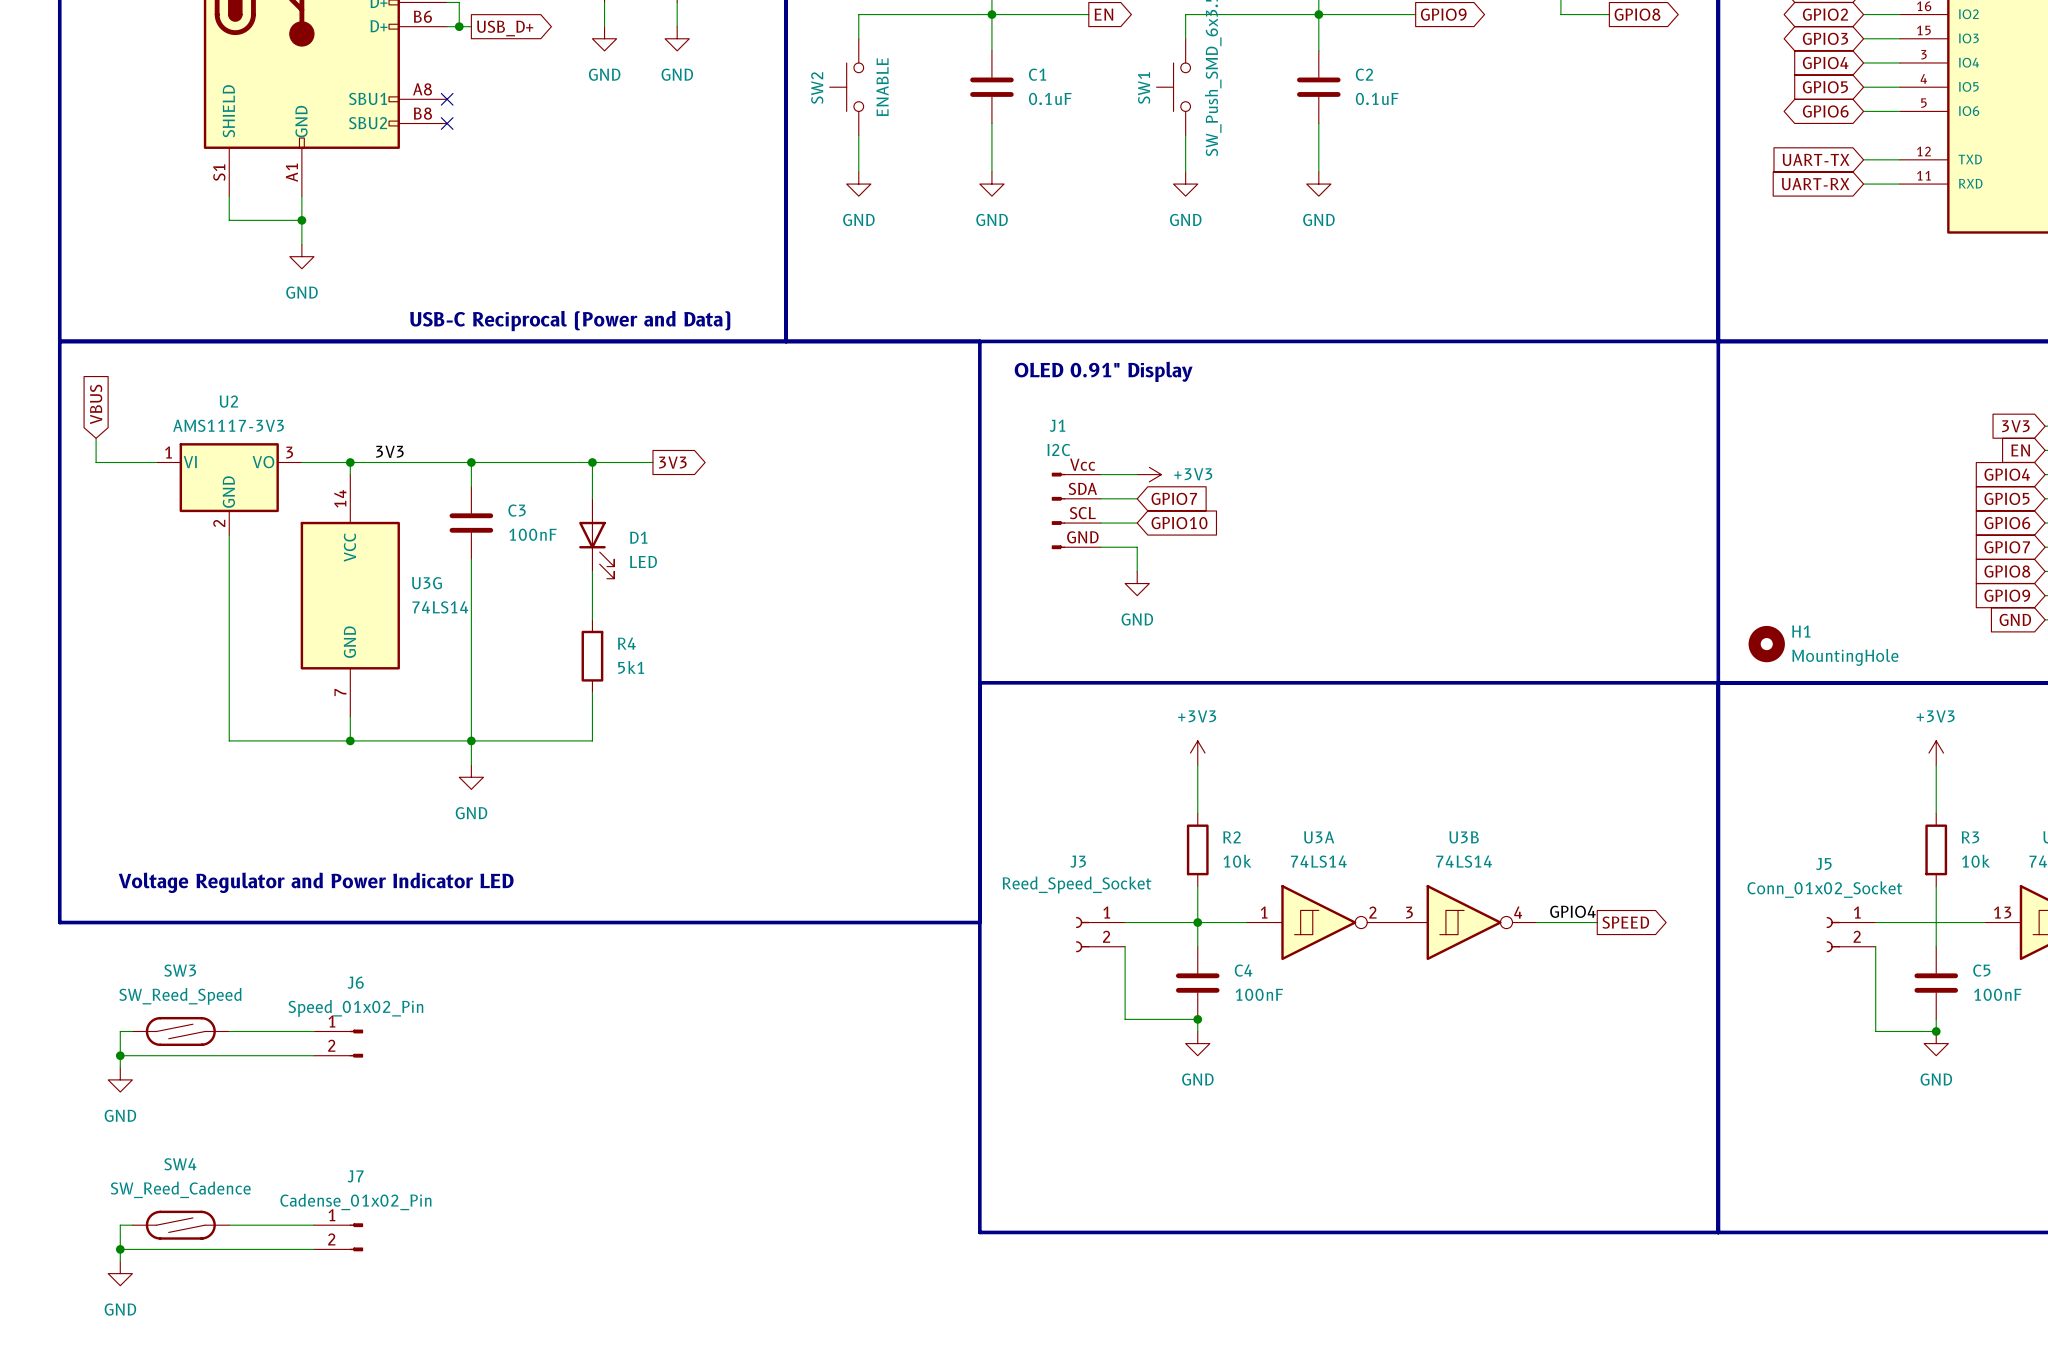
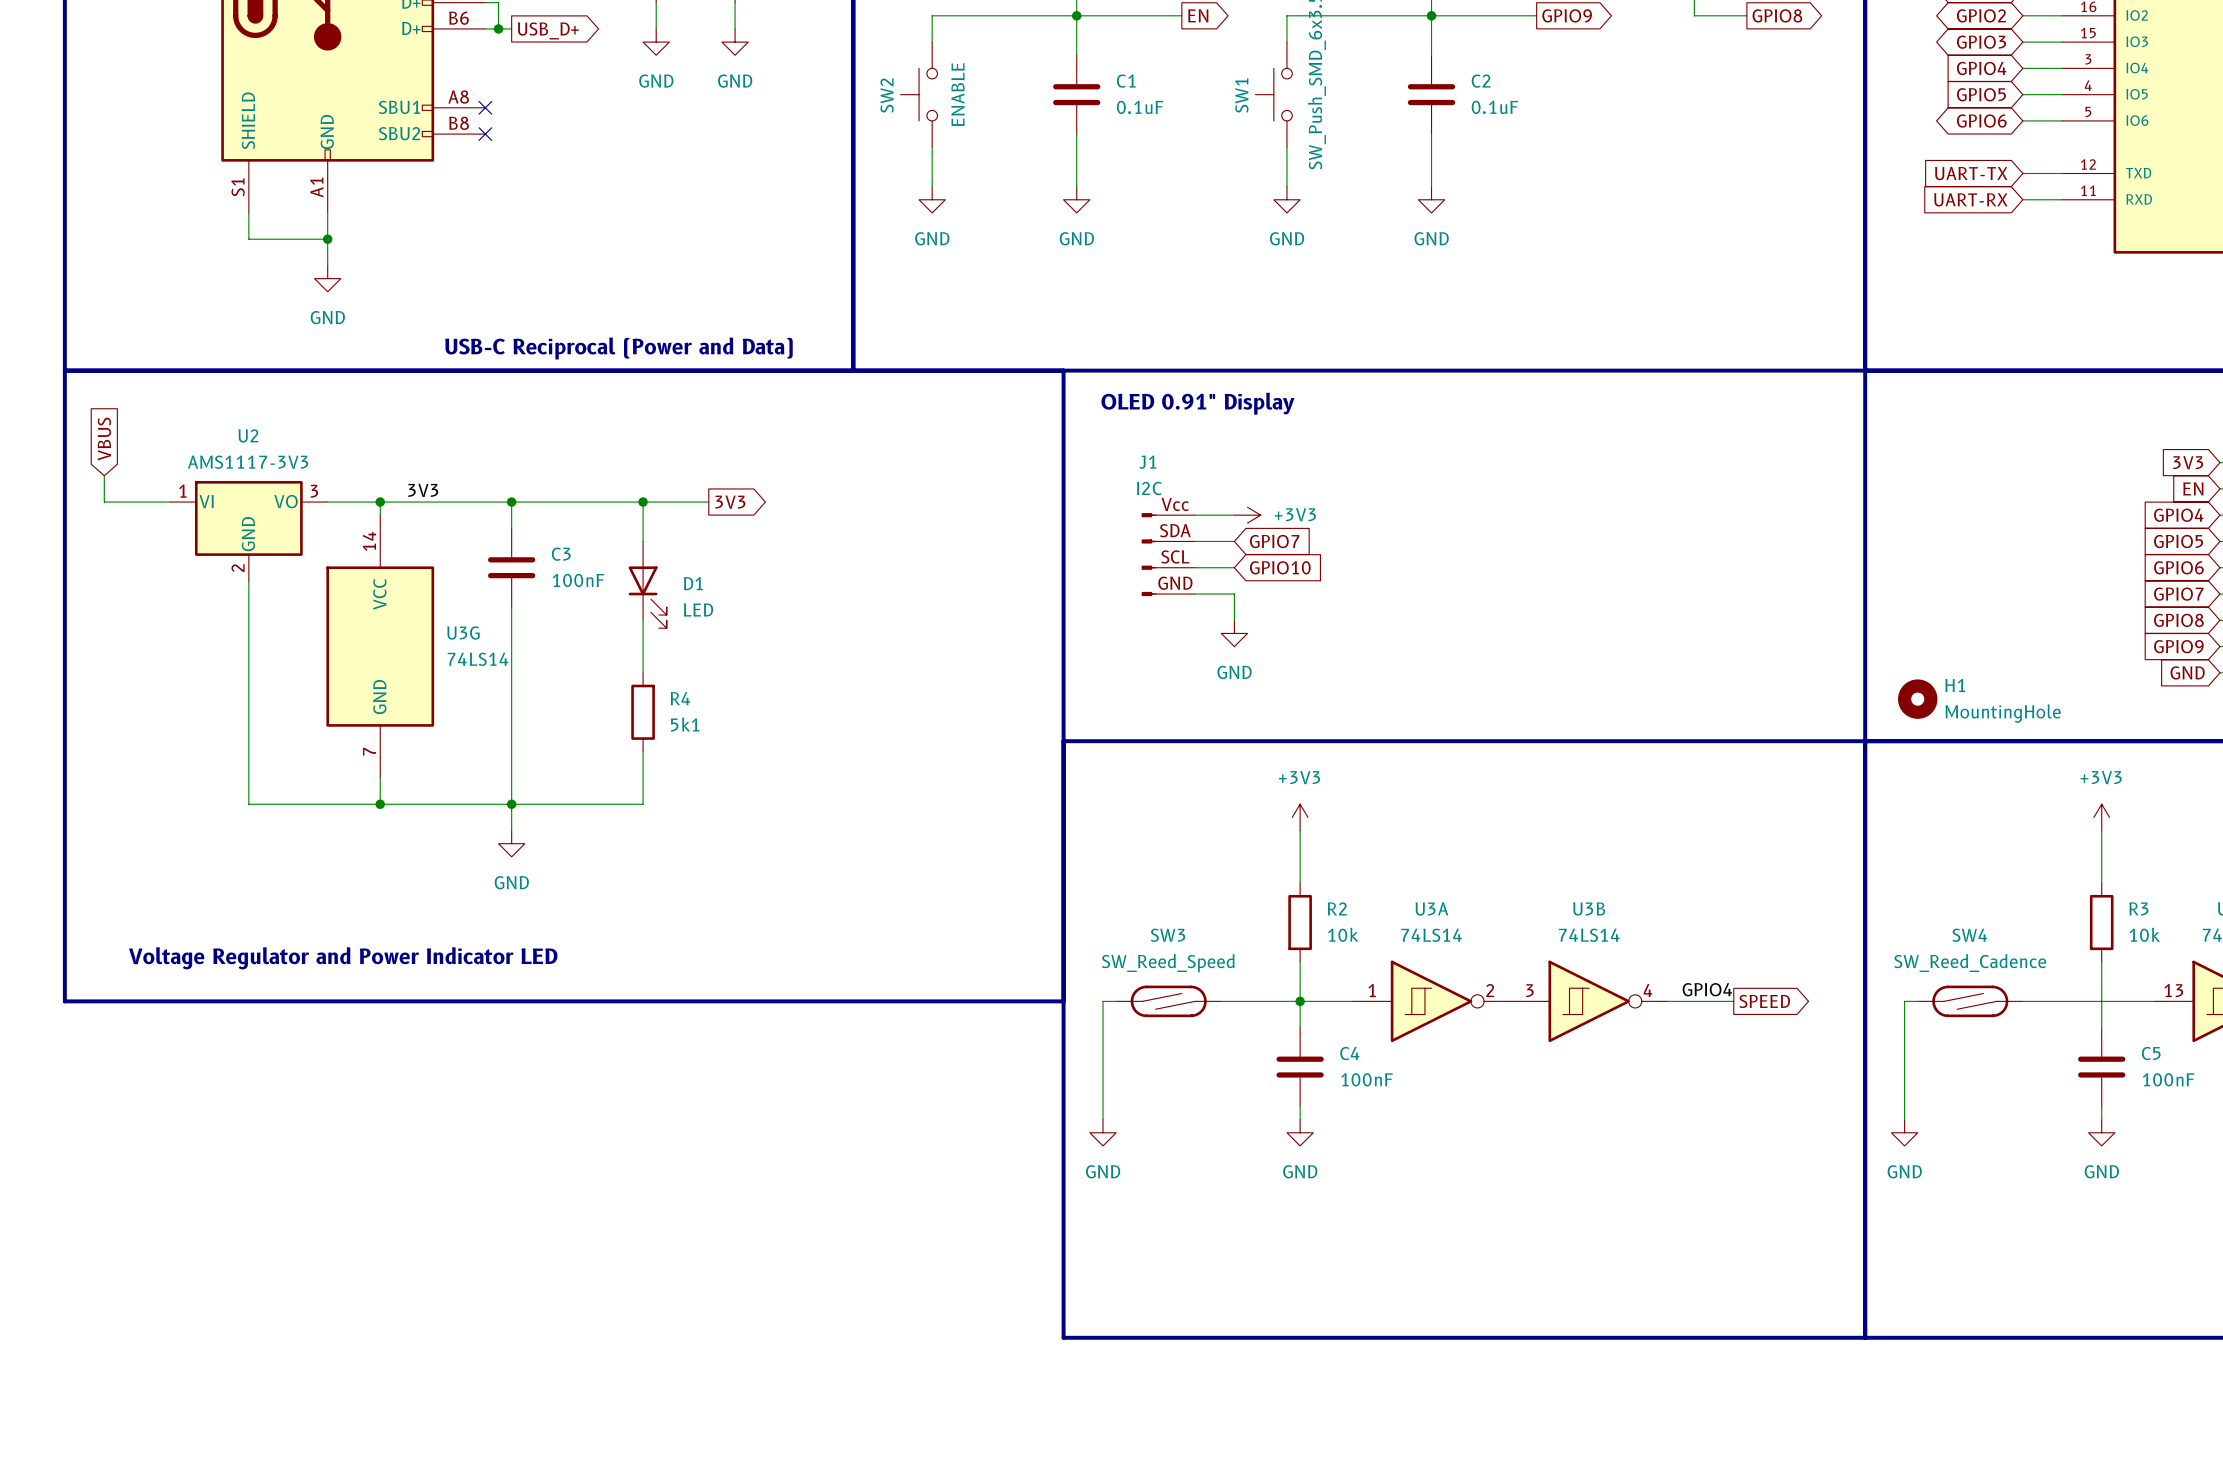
wire: none -> (1116, 1001) (1103, 1001) (1103, 1119)
wire: none -> (1917, 1001) (1904, 1001) (1904, 1119)
J3: Reed_Speed_Socket (1100, 934) -> none
J5: Conn_01x02_Socket (1851, 934) -> none
wire: (1125, 946) (1125, 1019) (1197, 1019) -> none
wire: (1875, 946) (1875, 1031) (1936, 1031) -> none
junction: (1197, 1019) -> none
wire: (132, 1031) (120, 1031) (120, 1067) -> none
SW3 position: (180, 1031) -> (1168, 1001)
wire: (229, 1031) (313, 1031) -> none
junction: (1936, 1031) -> none
J6: Speed_01x02_Pin (338, 1043) -> none
power symbol: none -> GND (1103, 1132)
power symbol: none -> GND (1904, 1132)
wire: (120, 1055) (313, 1055) -> none
junction: (120, 1055) -> none
power symbol: GND (120, 1079) -> none
wire: (132, 1225) (120, 1225) (120, 1261) -> none
SW4 position: (180, 1225) -> (1970, 1001)
wire: (229, 1225) (313, 1225) -> none
J7: Cadense_01x02_Pin (338, 1237) -> none
wire: (120, 1249) (313, 1249) -> none
junction: (120, 1249) -> none
power symbol: GND (120, 1273) -> none

